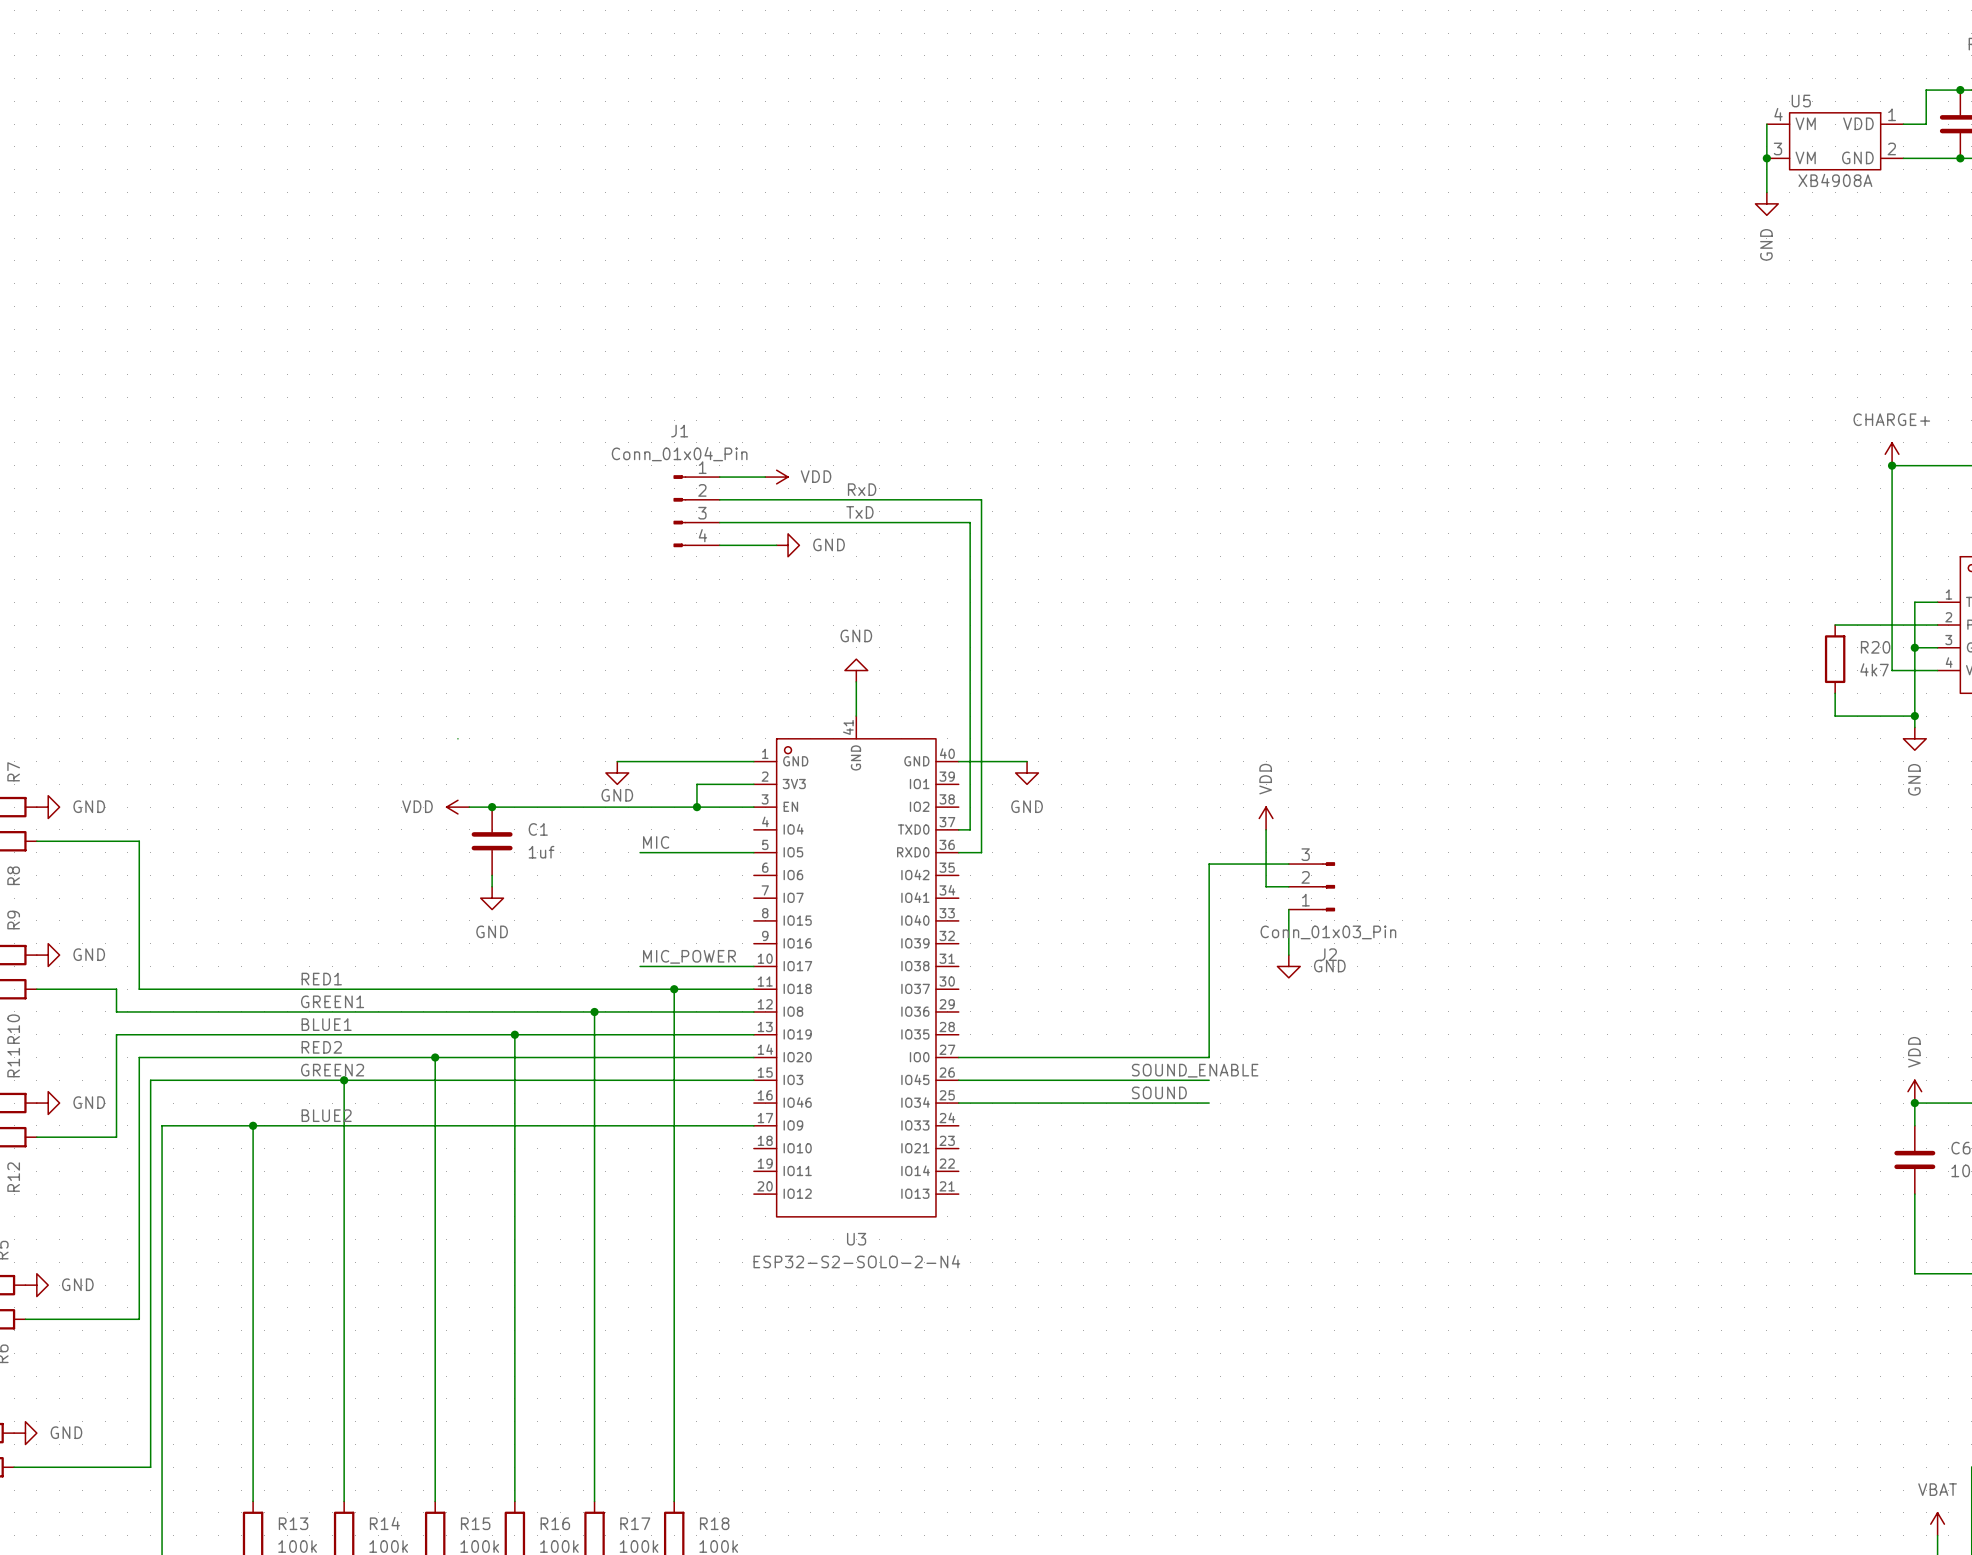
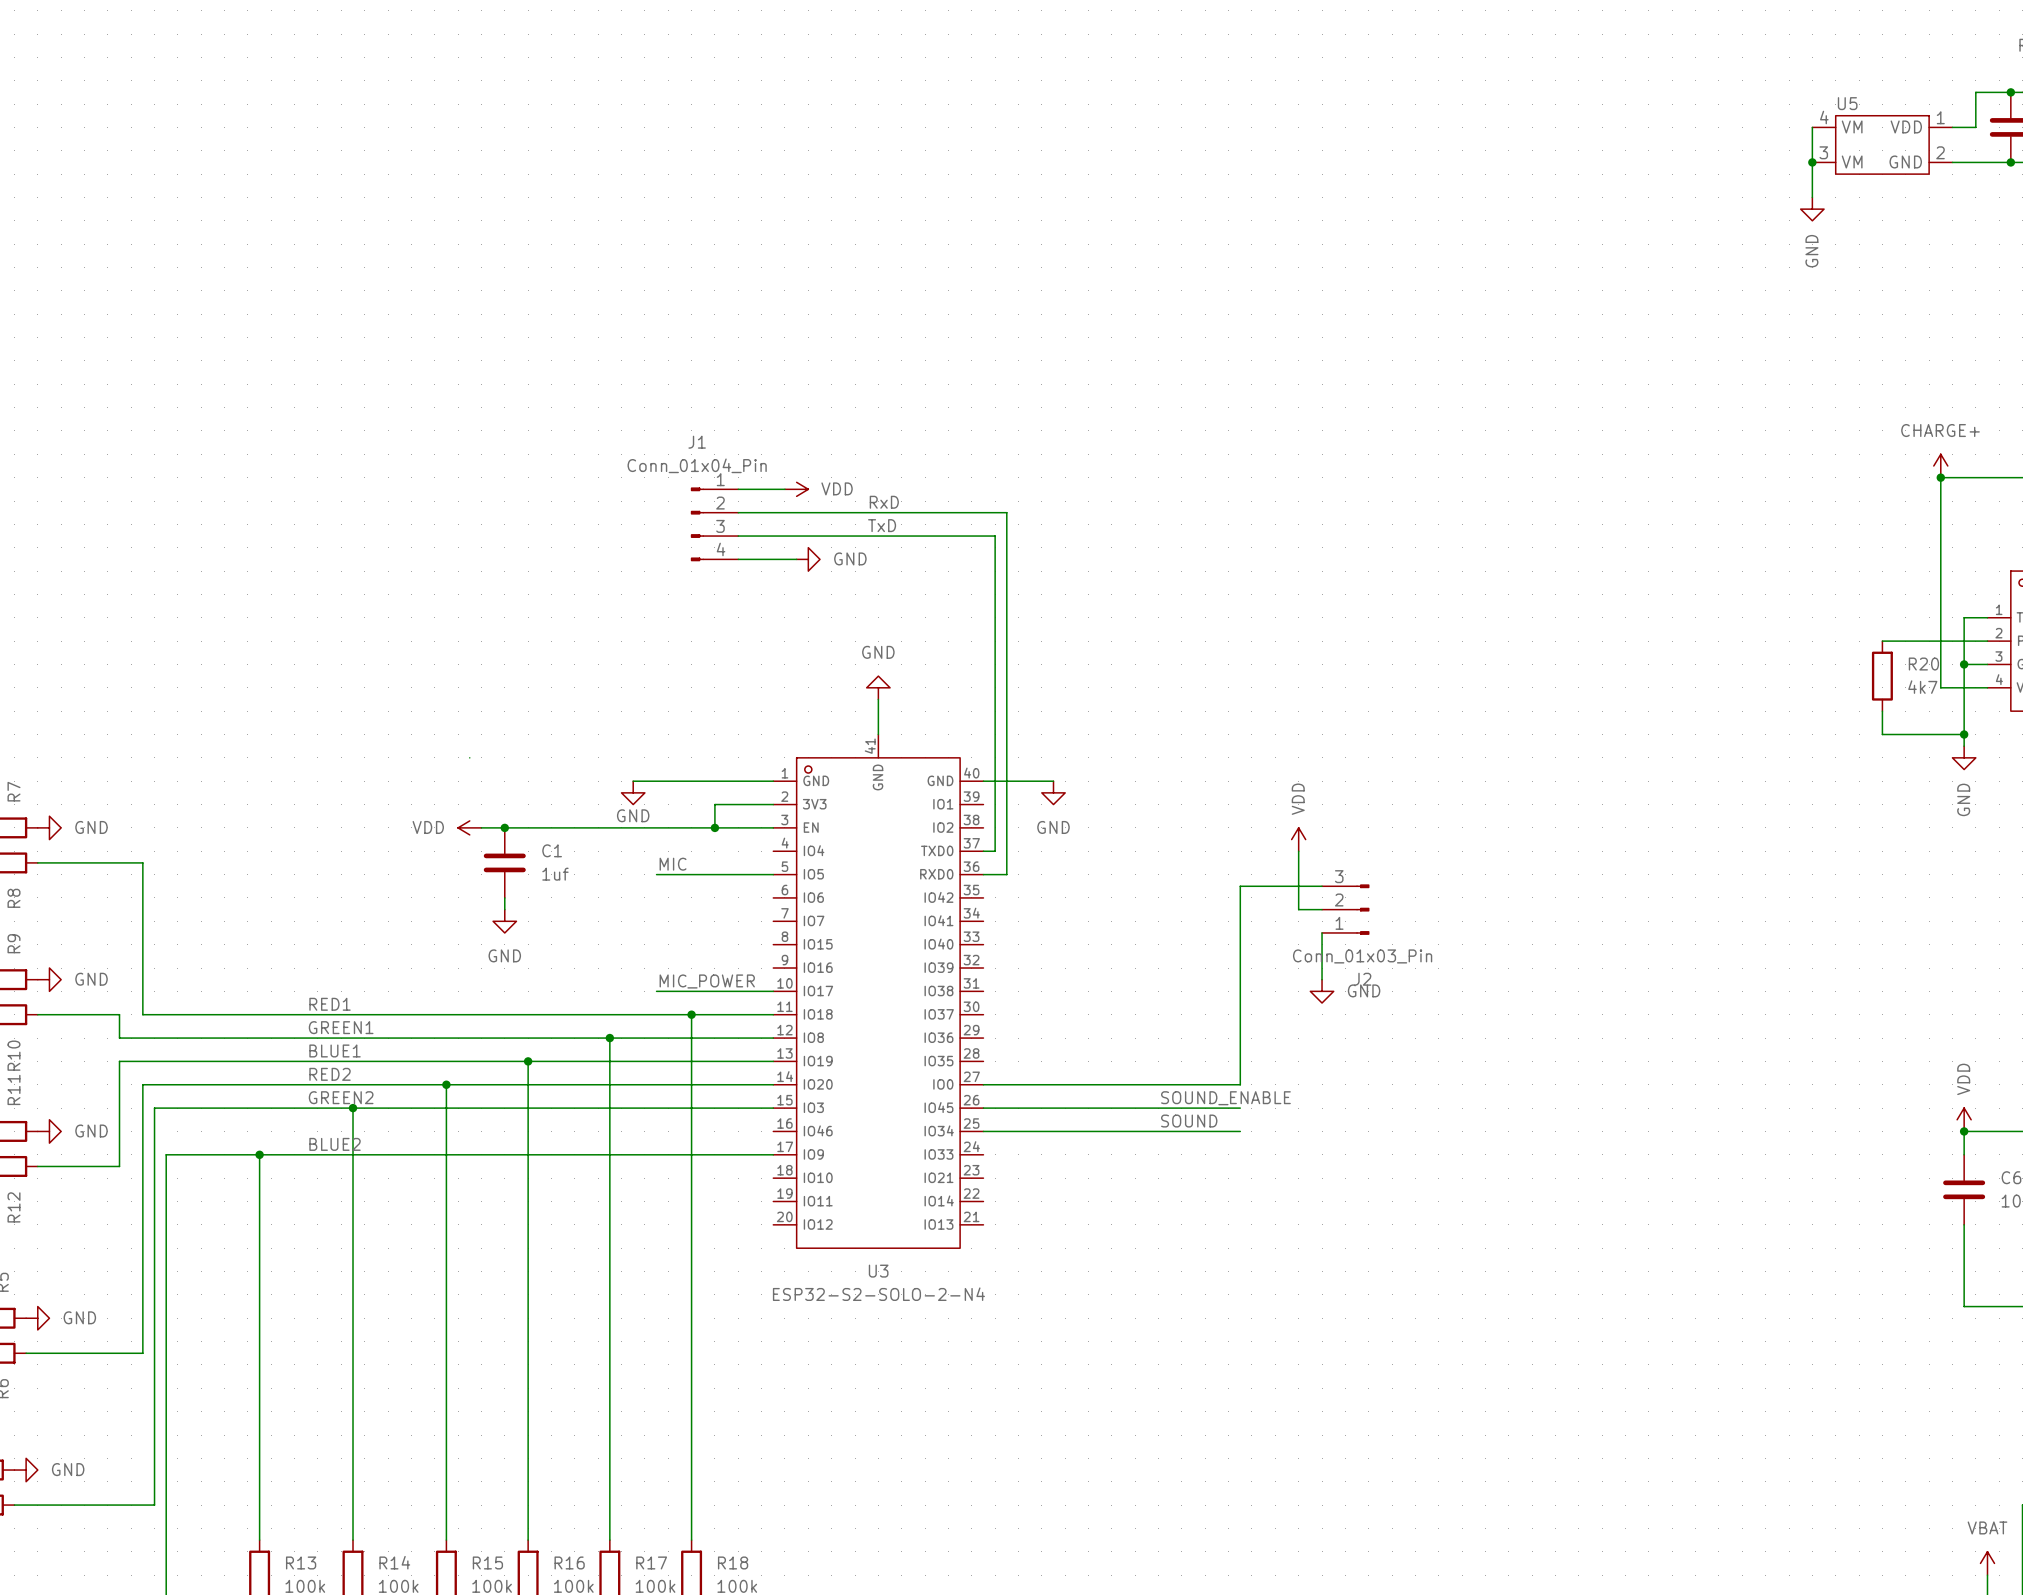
U5 value: XB4908A (1835, 180) -> none

